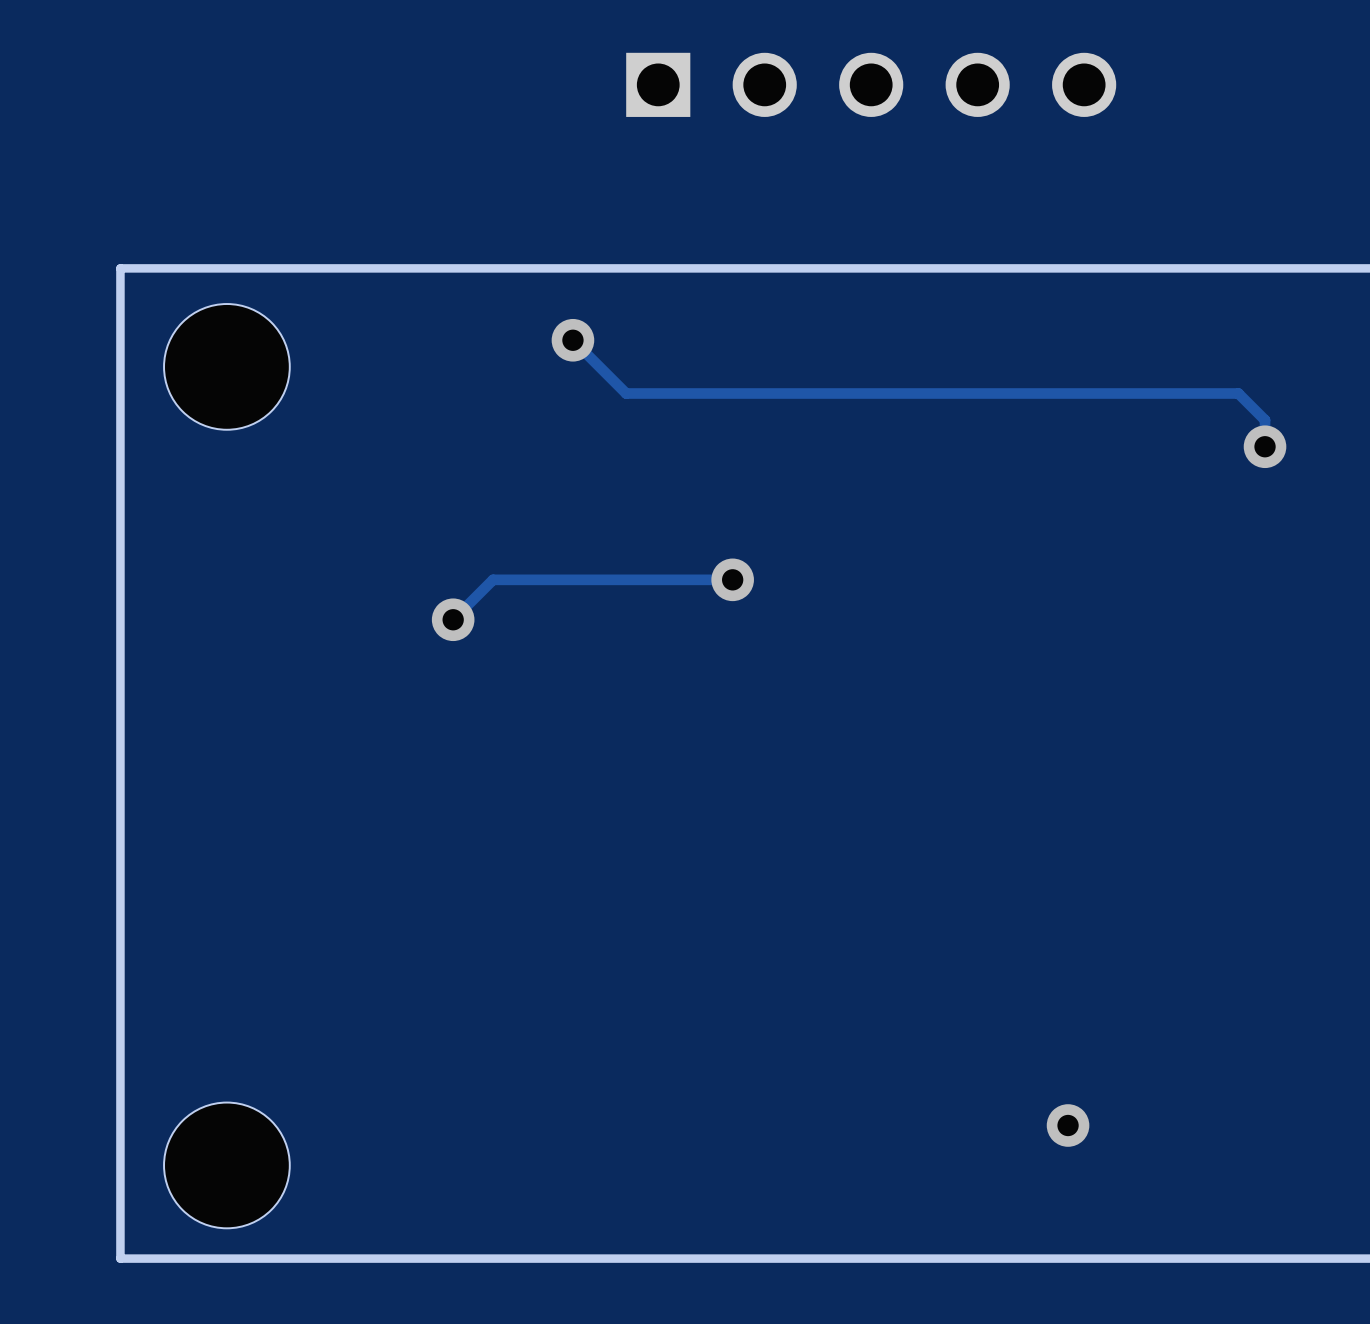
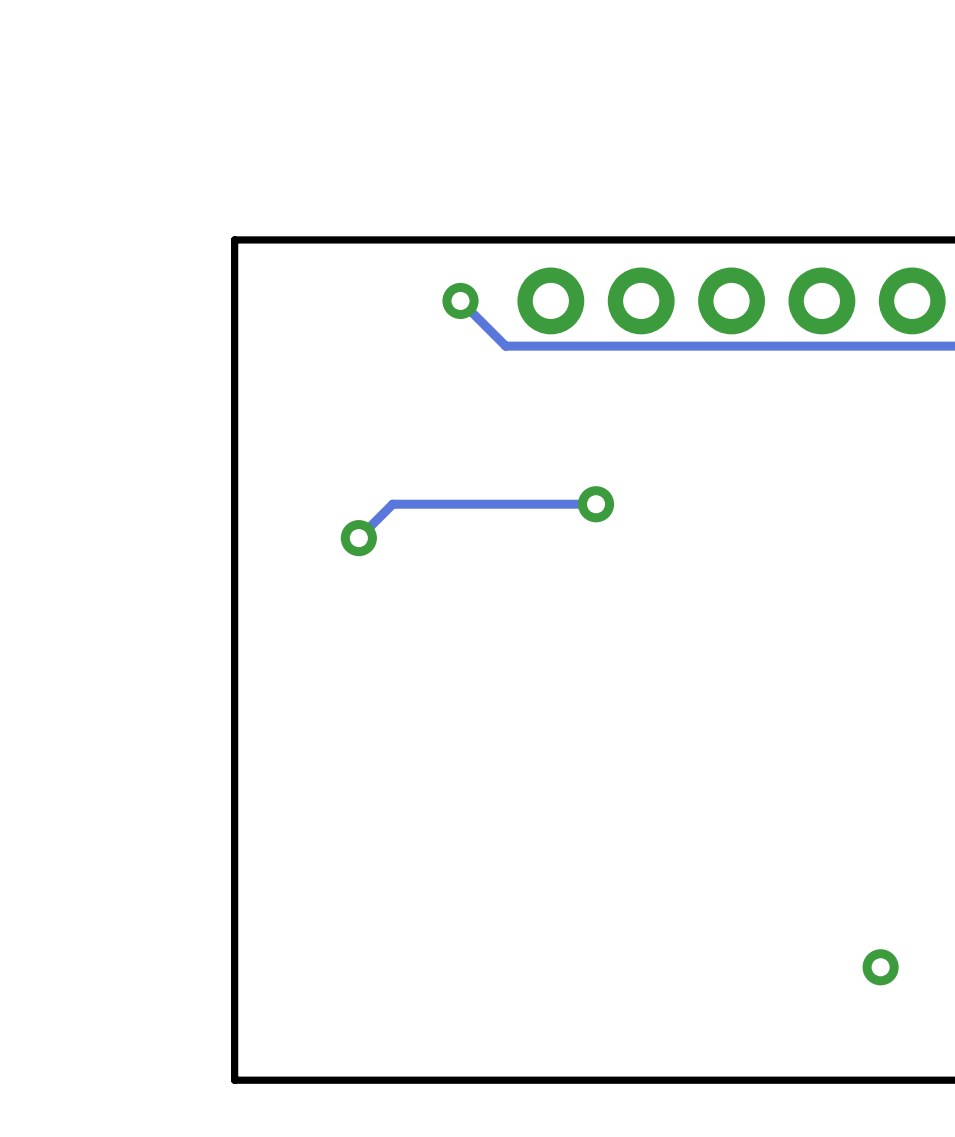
part: (871, 84) -> none
board edge: (306, 268) (120, 268) (120, 1258) (306, 1258) -> (234, 239) (234, 1080)
part: none -> (731, 300)
hole: (226, 366) -> none
hole: (226, 1165) -> none

